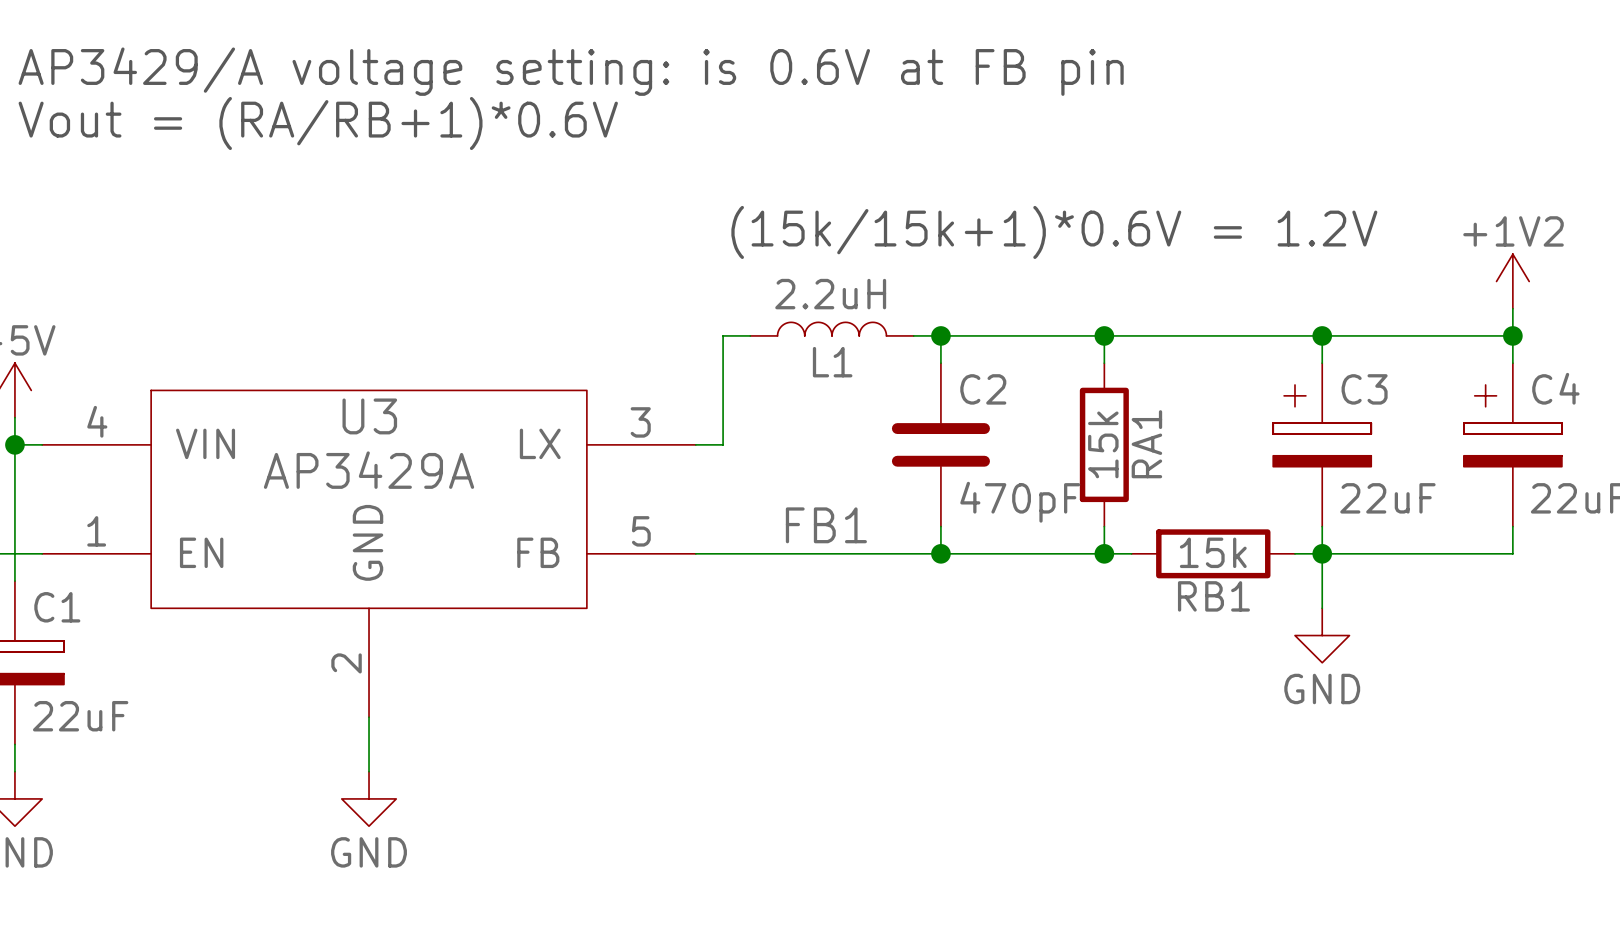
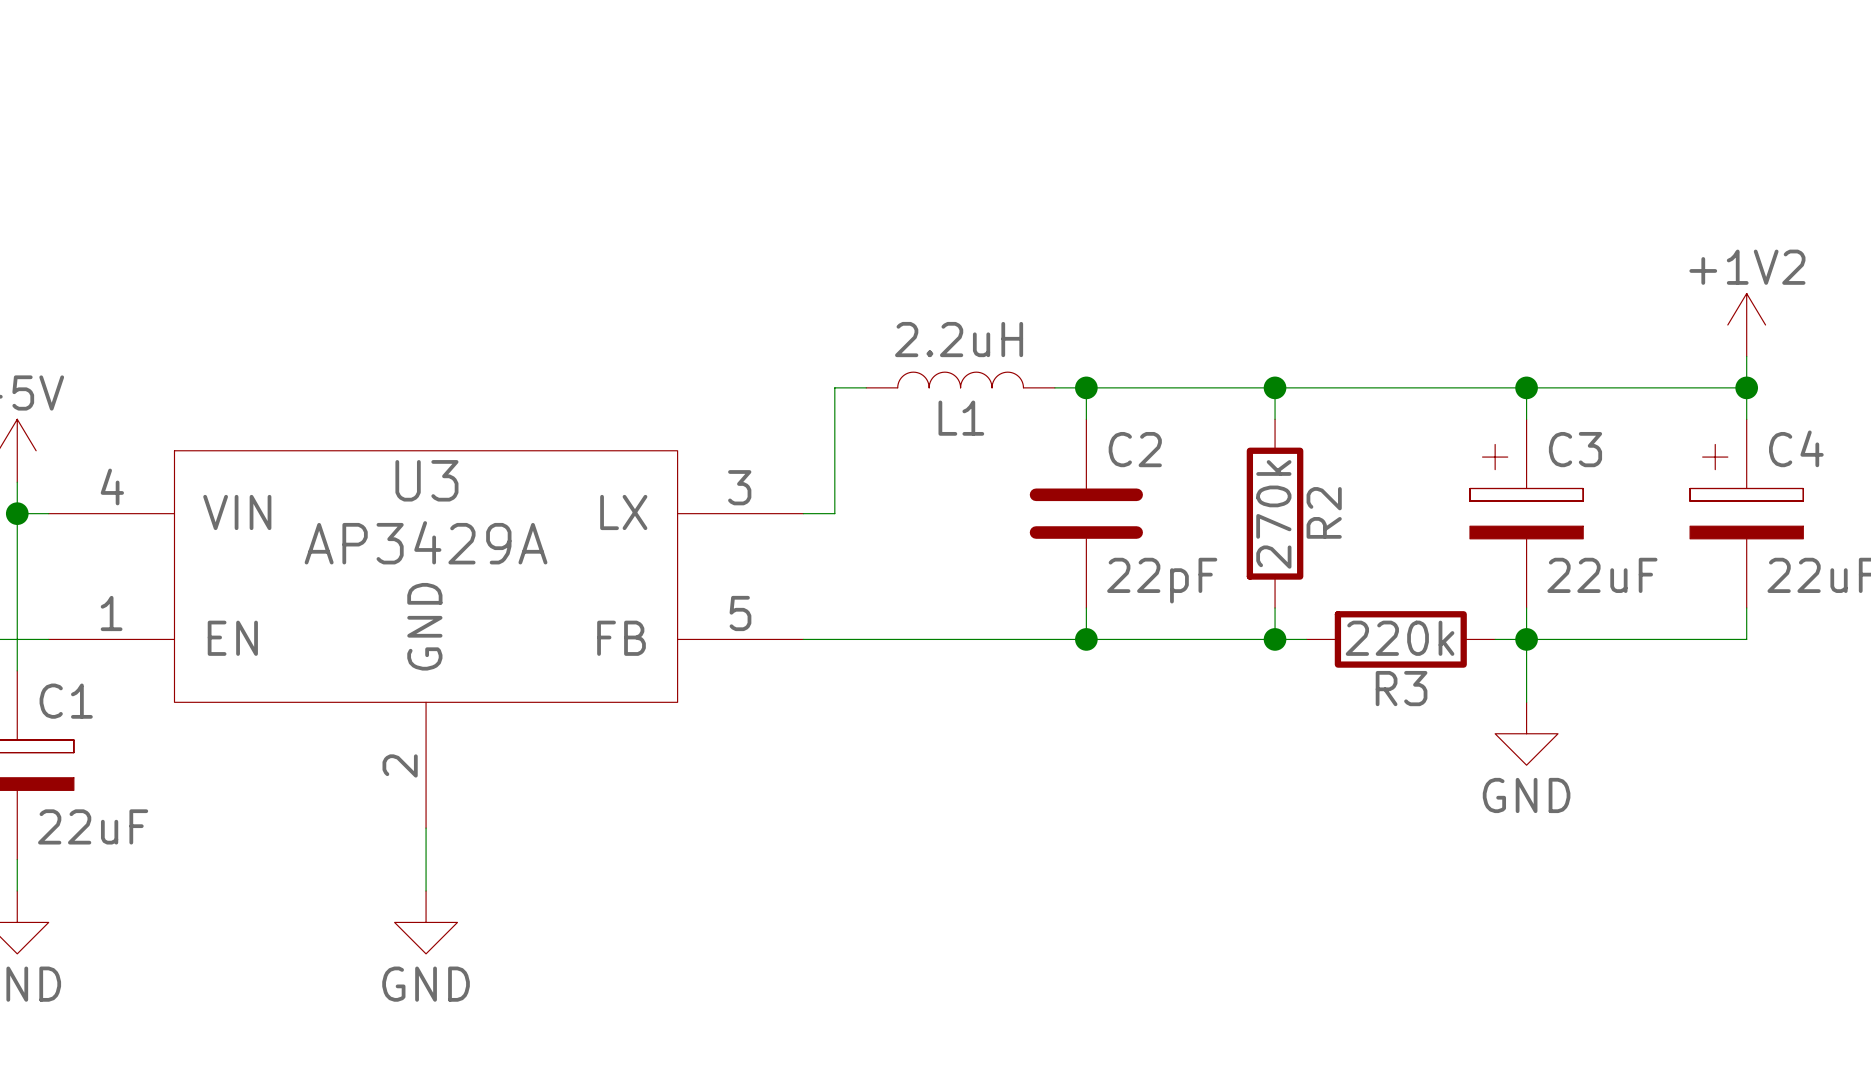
text: AP3429/A voltage setting: is 0.6V at FB pin (571, 71) -> none
text: Vout = (RA/RB+1)*0.6V (318, 123) -> none
text: (15k/15k+1)*0.6V = 1.2V (1054, 232) -> none
RA1 value: 15k (1103, 444) -> 270k (1273, 514)
RA1 name: RA1 (1146, 444) -> R2 (1324, 512)
C2 value: 470pF (1020, 502) -> 22pF (1162, 580)
label: FB1 (826, 525) -> none
RB1 value: 15k (1213, 552) -> 220k (1400, 638)
RB1 name: RB1 (1213, 596) -> R3 (1401, 688)

